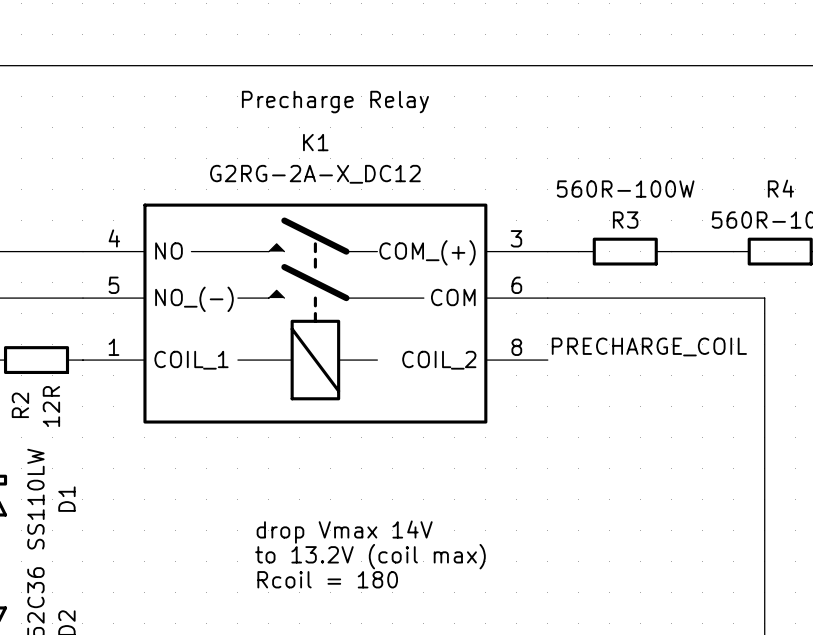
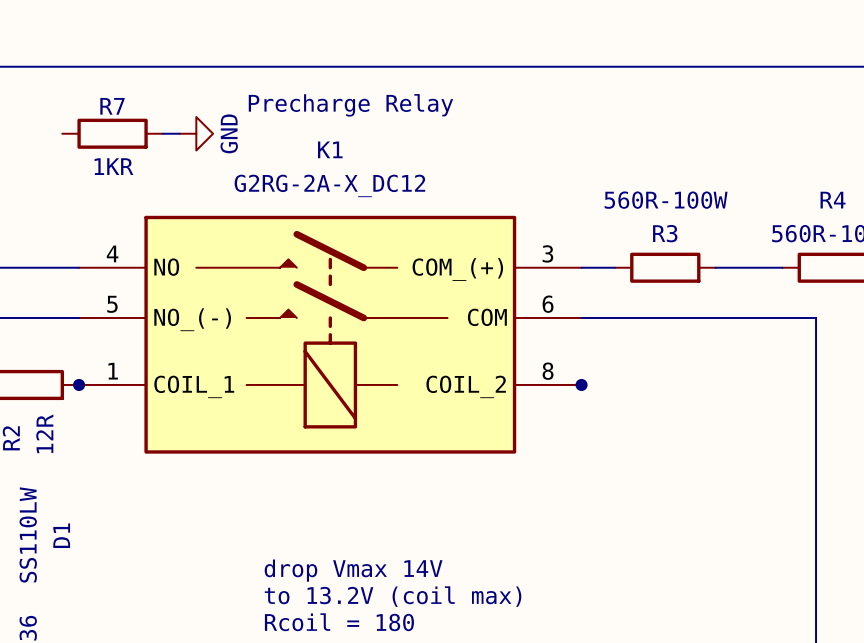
R7: none -> 1KR (112, 133)
wire: none -> (162, 133) (179, 133)
power symbol: none -> GND (196, 133)
label: PRECHARGE_COIL (649, 346) -> none
junction: none -> (79, 384)
junction: none -> (581, 384)

